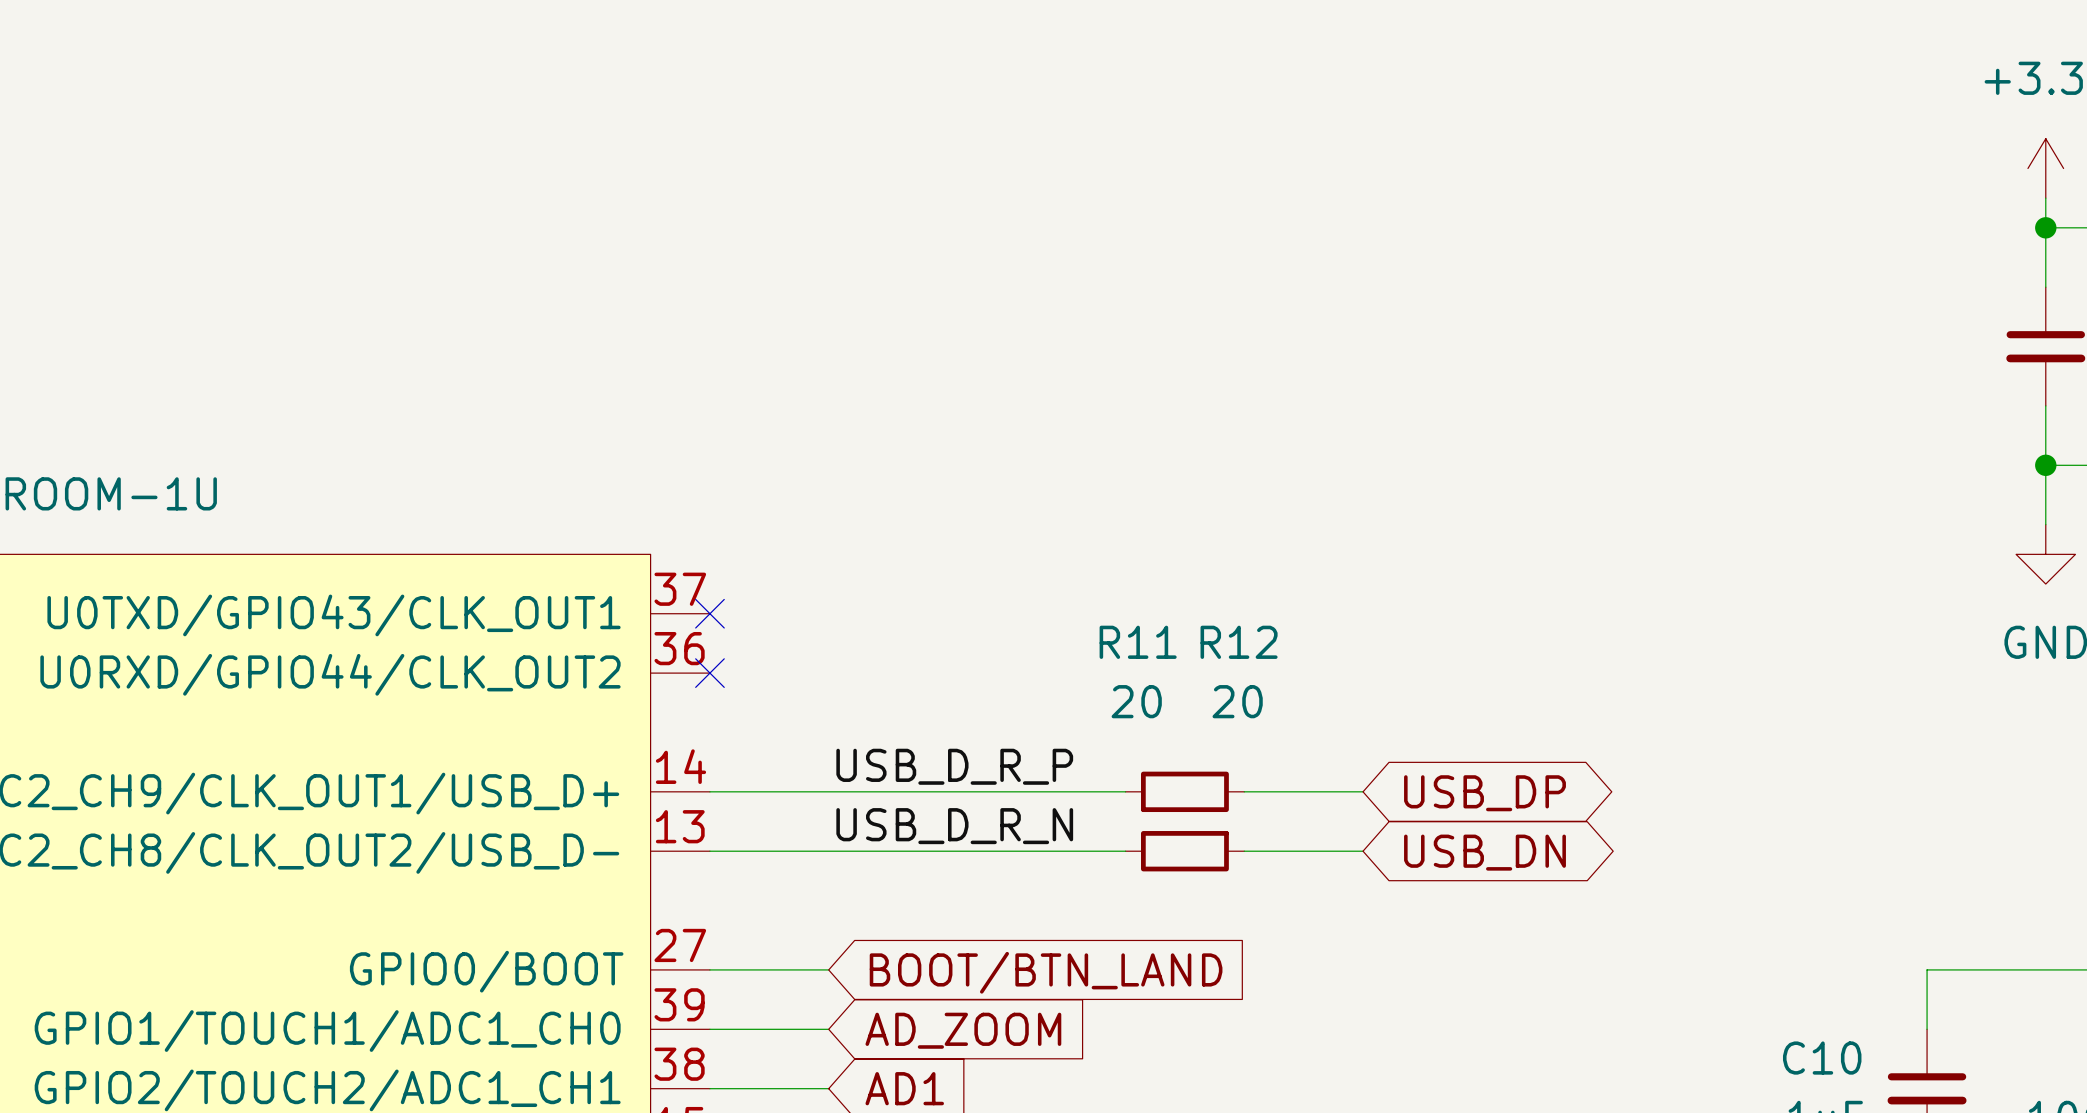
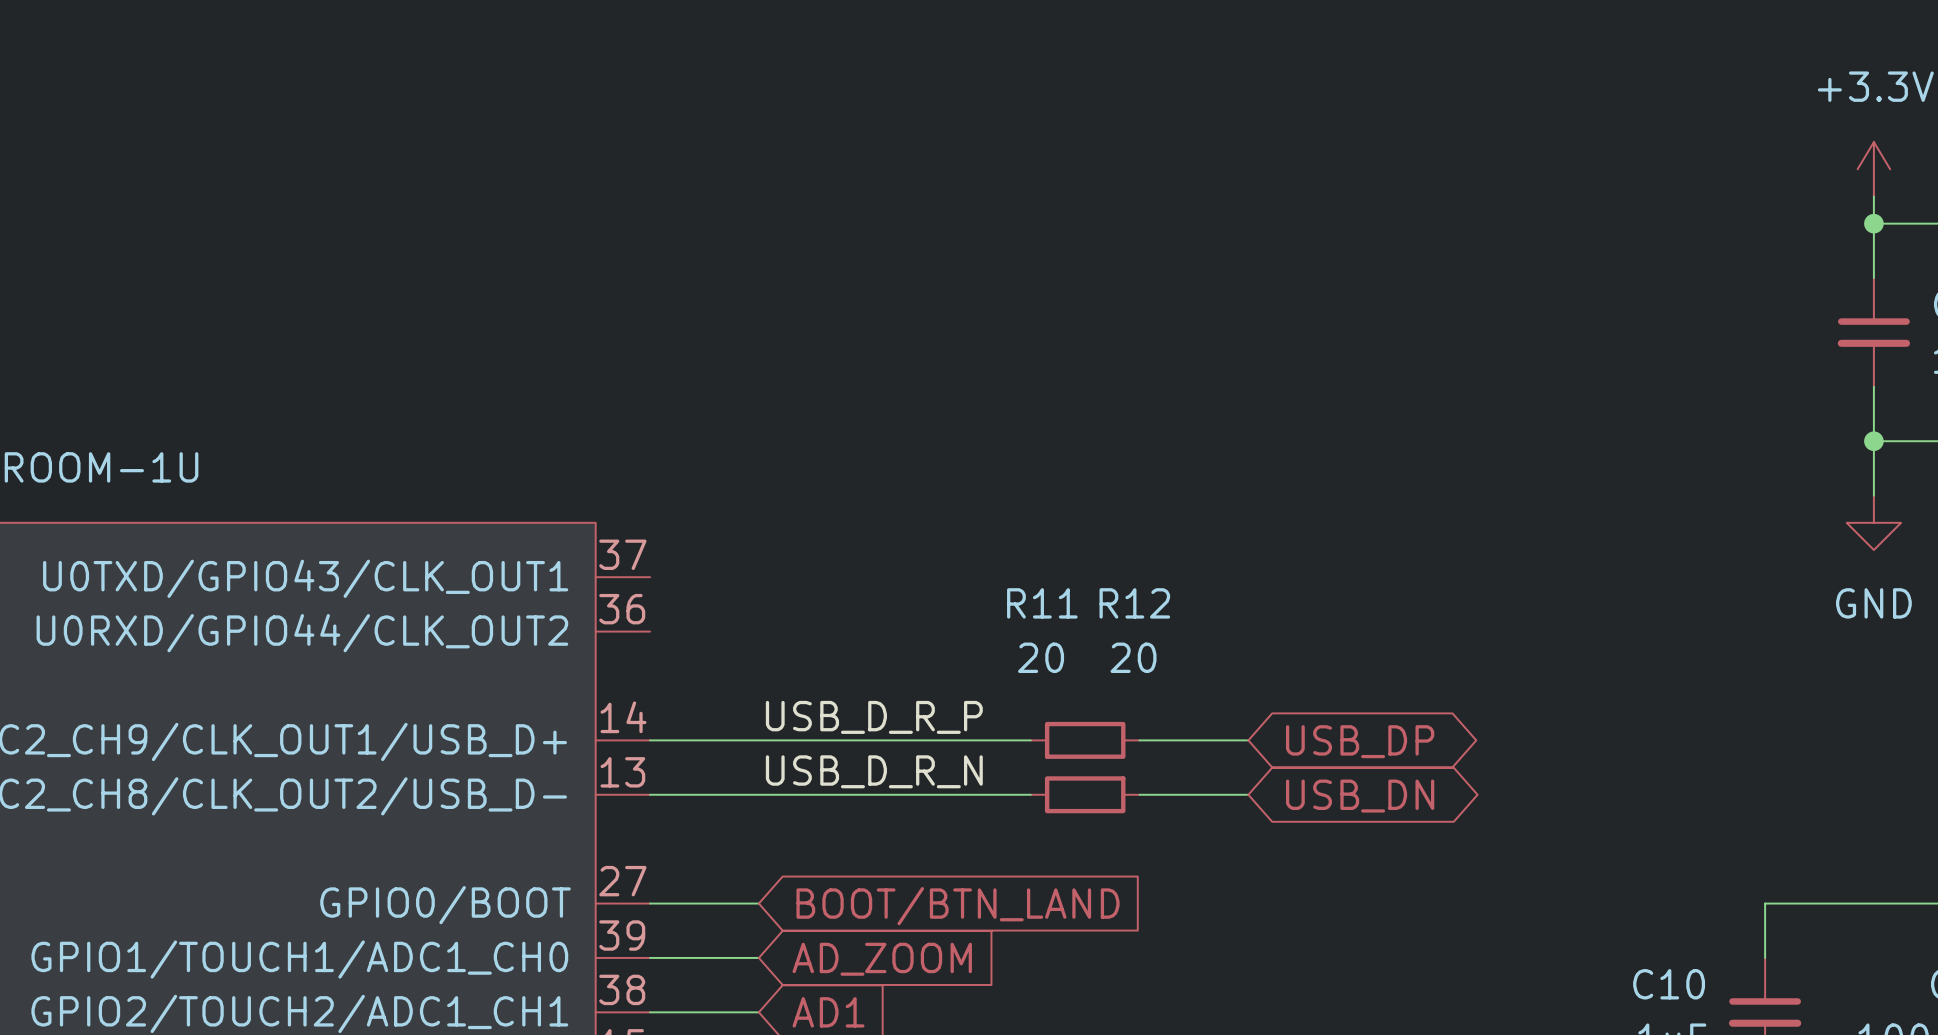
no-connect mark: (709, 613) -> none
no-connect mark: (709, 673) -> none

